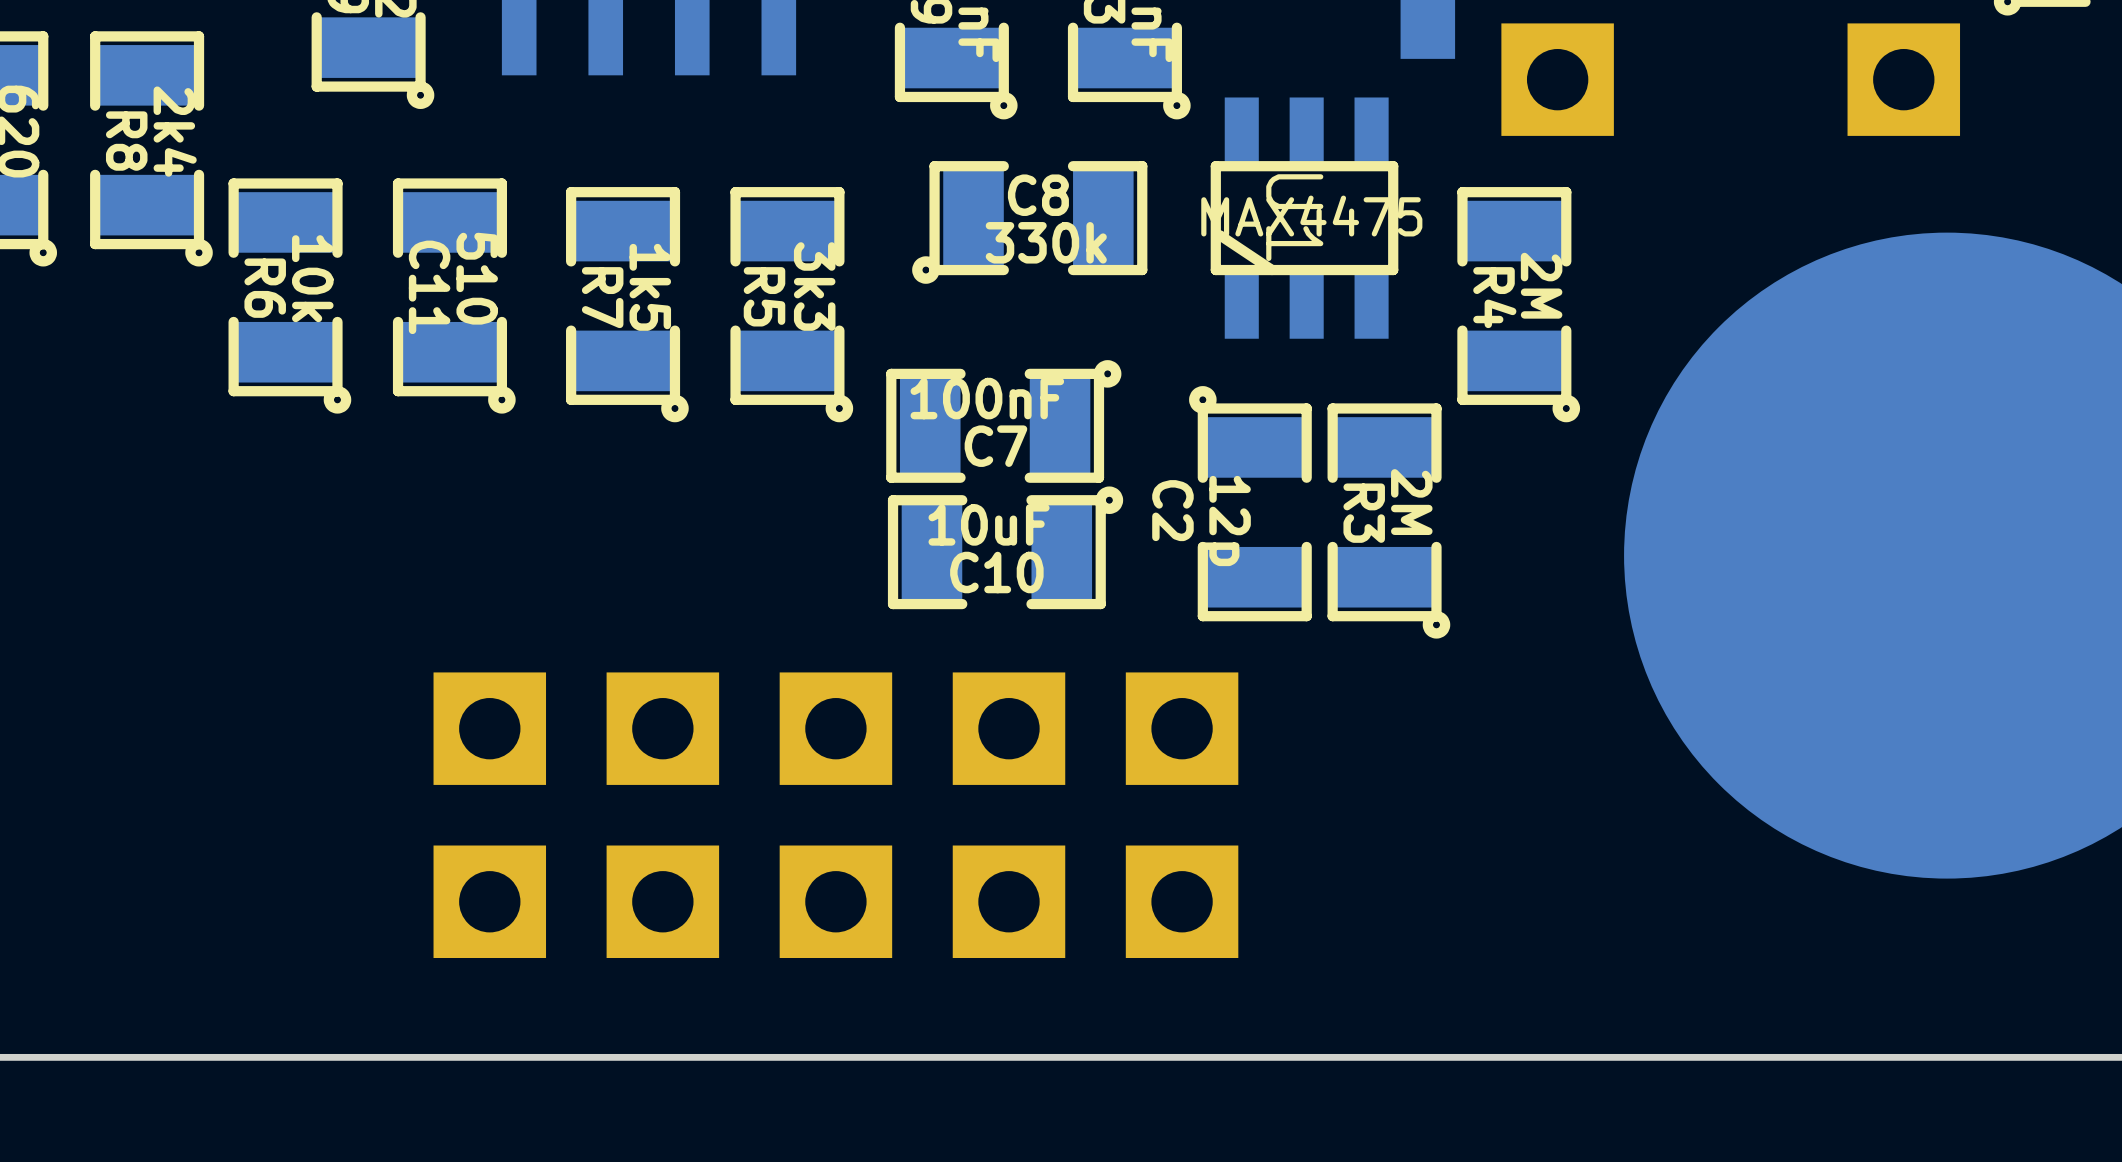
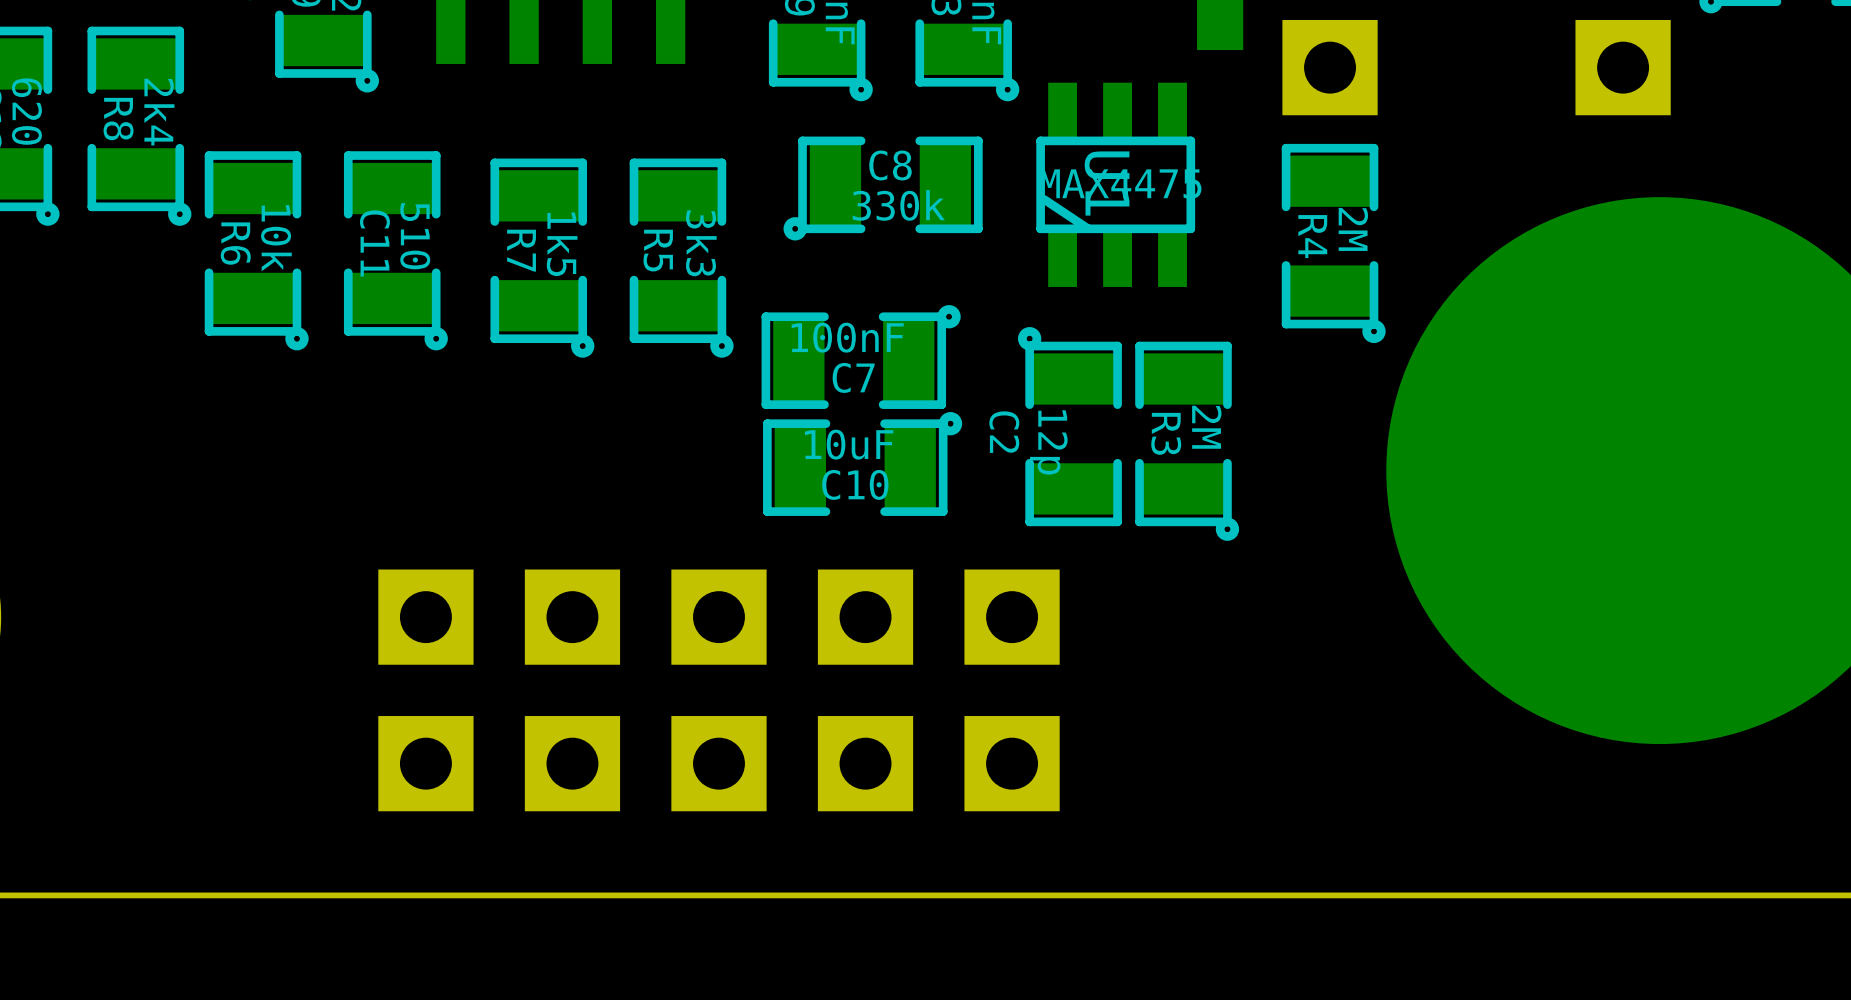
R4 position: (1518, 304) -> (1333, 243)

